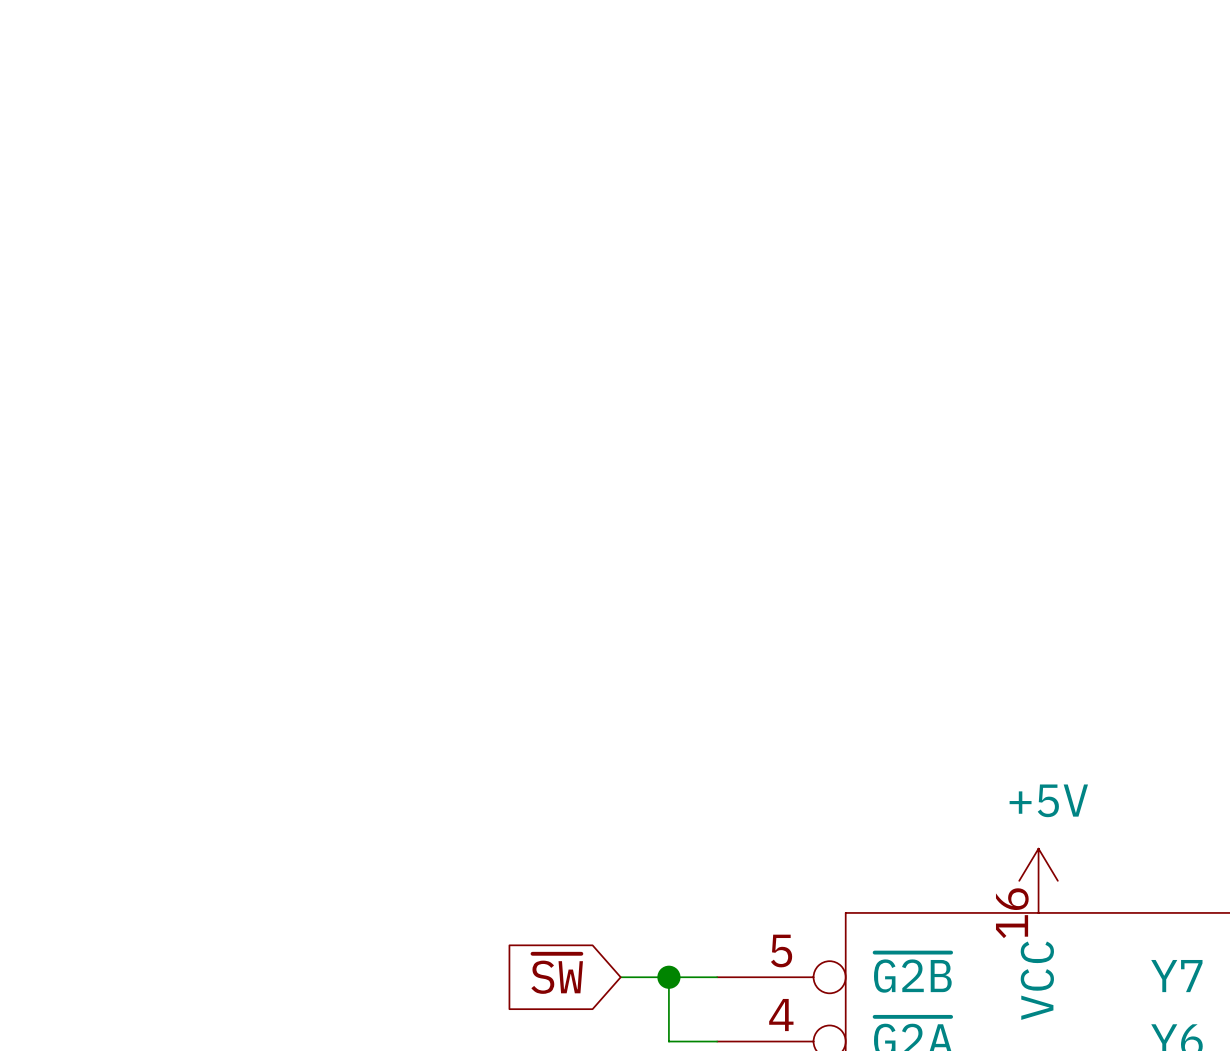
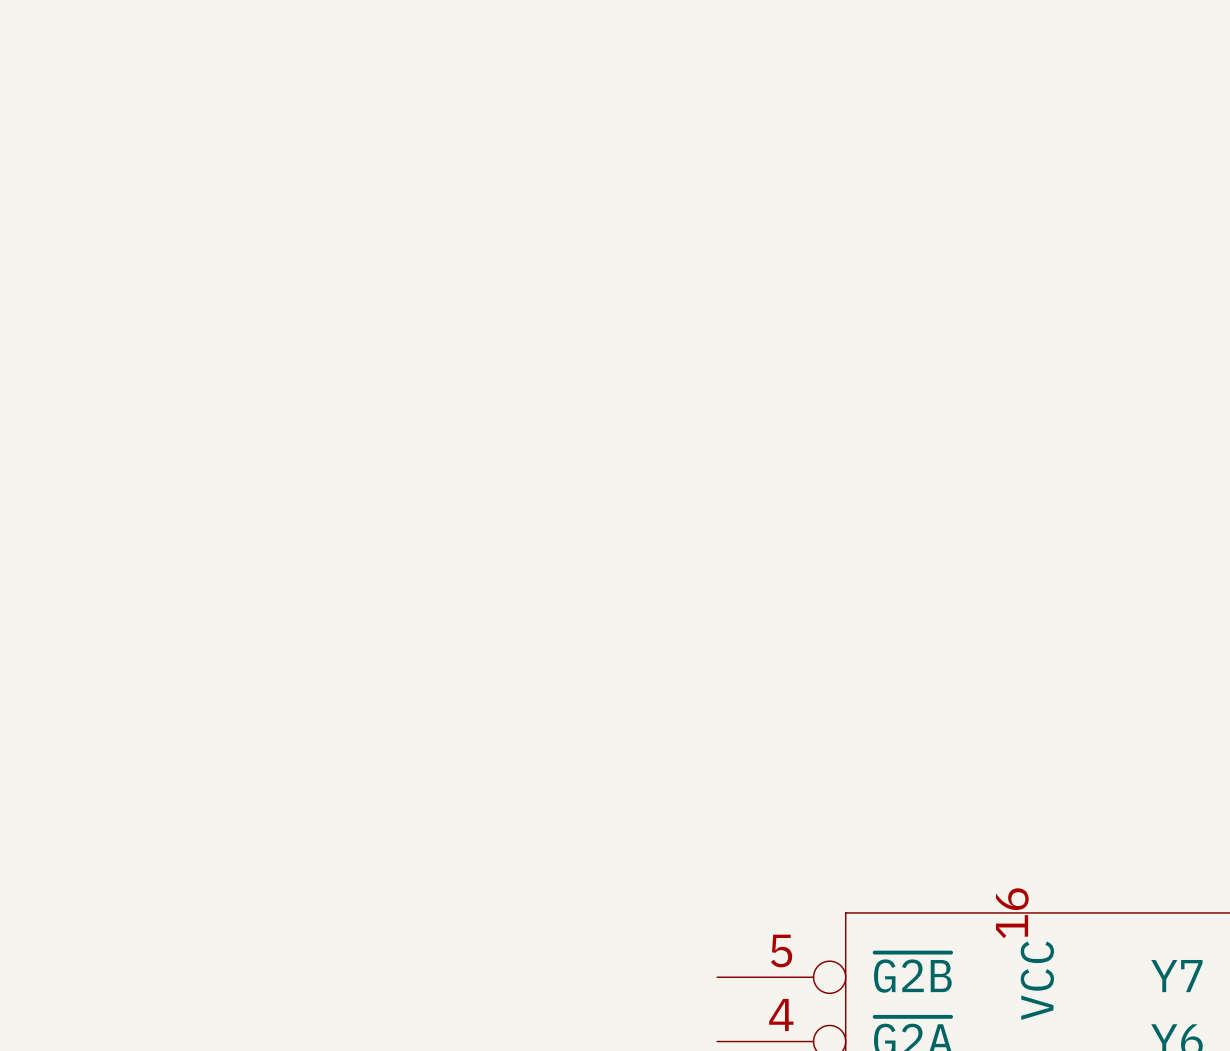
power symbol: +5V (1038, 880) -> none
global label: ~{SW} (557, 973) -> none
wire: (620, 977) (717, 977) -> none
wire: (668, 977) (668, 1041) (717, 1041) -> none
junction: (668, 977) -> none

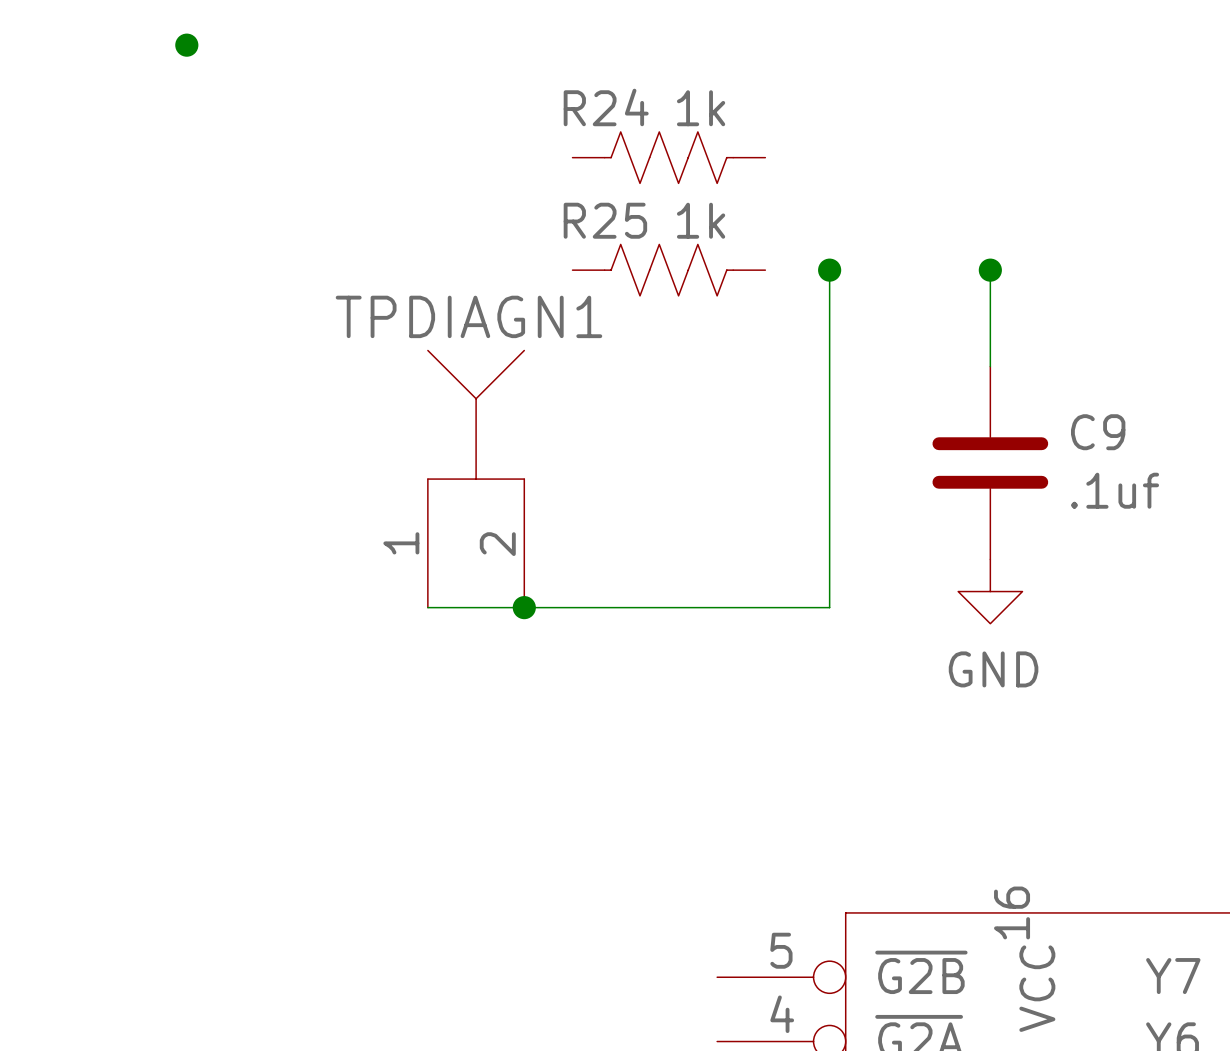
junction: none -> (186, 45)
R24: none -> 1k (668, 157)
R25: none -> 1k (668, 270)
wire: none -> (829, 270) (829, 607) (427, 607)
junction: none -> (829, 270)
wire: none -> (990, 270) (990, 366)
junction: none -> (990, 270)
C9: none -> .1uf (990, 462)
TPDIAGN1: none -> (476, 479)
power symbol: none -> GND (990, 591)
junction: none -> (524, 607)

